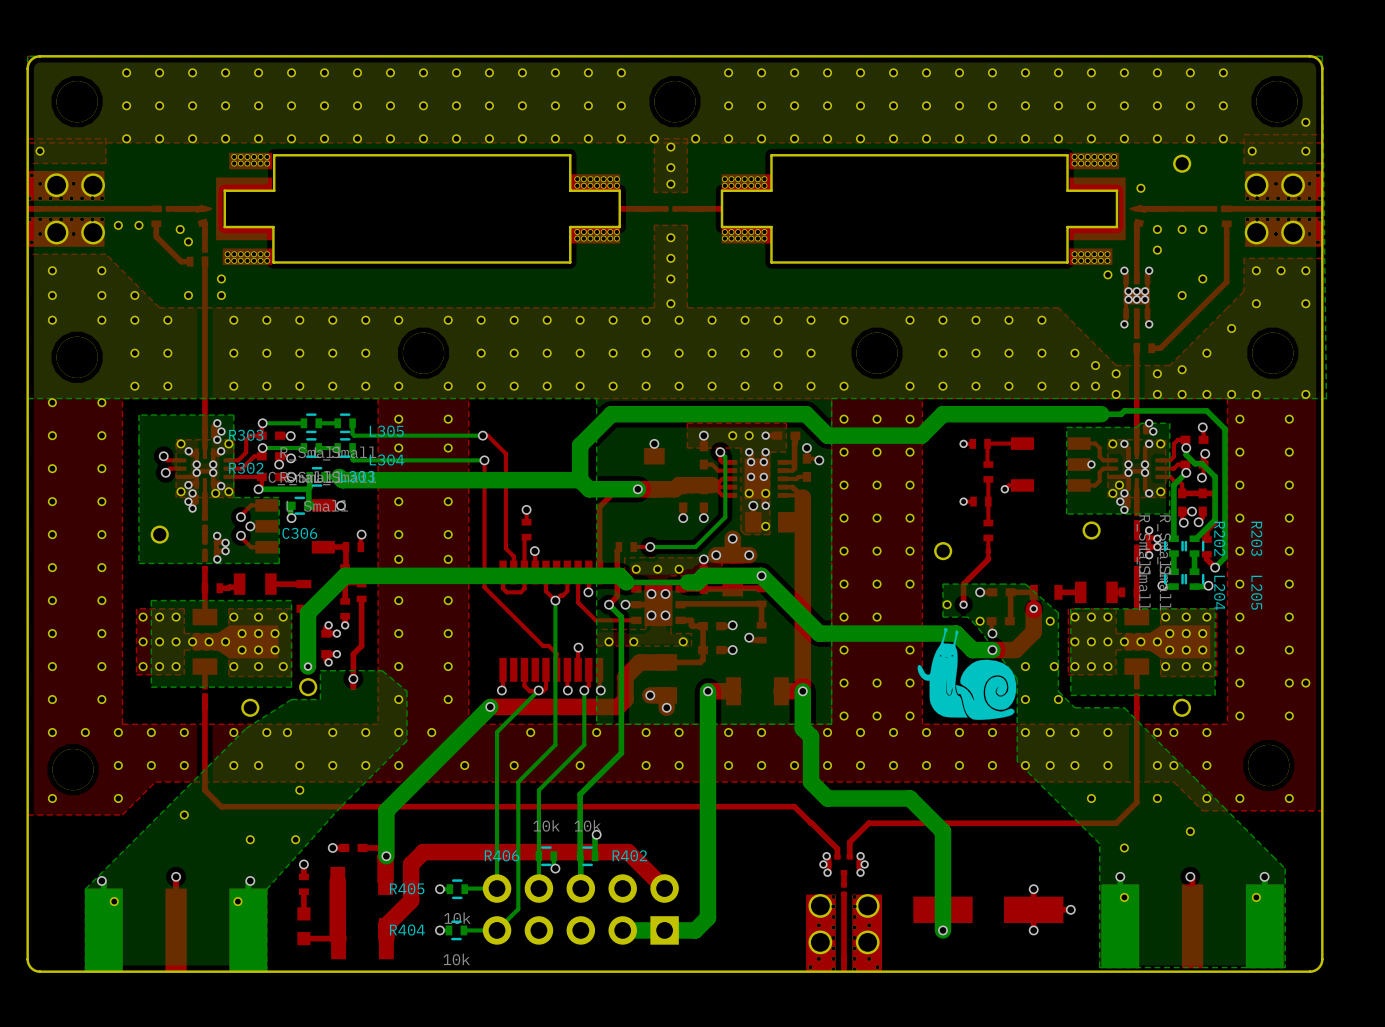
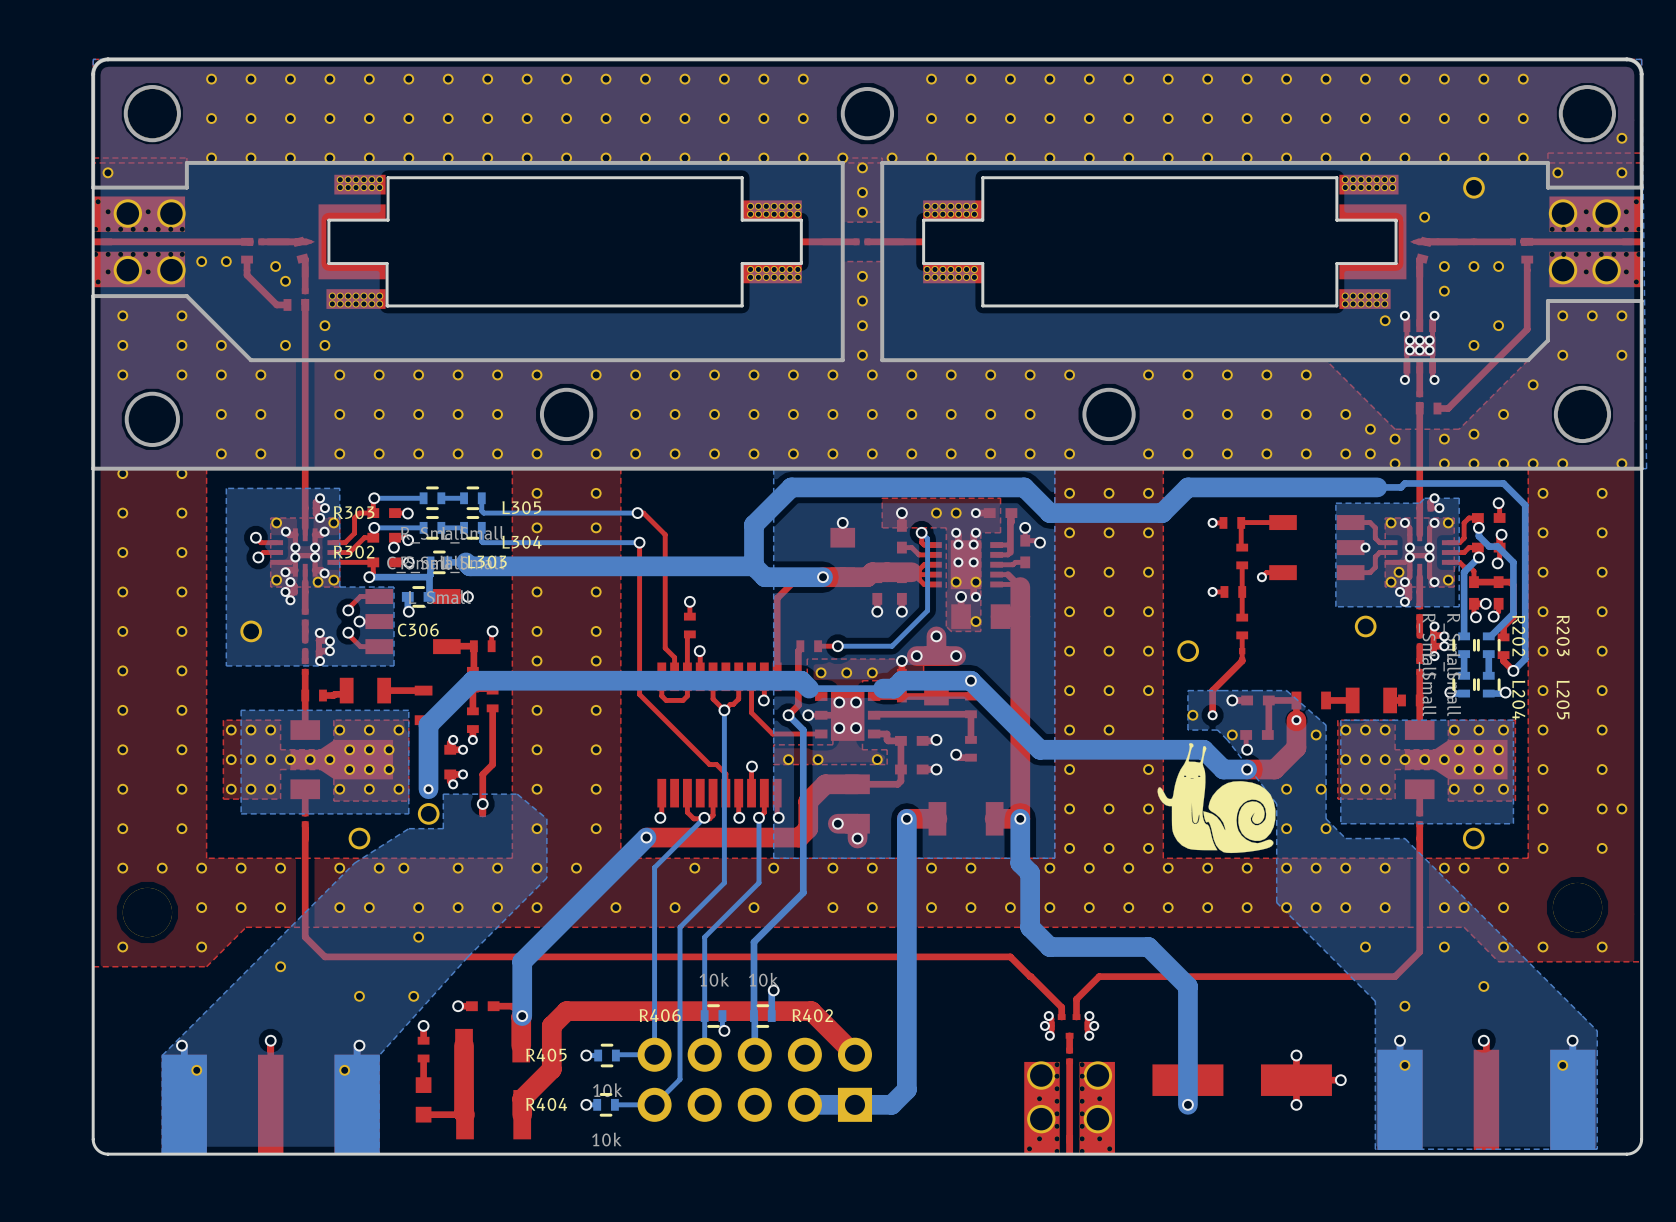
line: none -> (1626, 59) (104, 59) (97, 63) (93, 72) (93, 187) (186, 187) (186, 162) (842, 162) (842, 360) (250, 360) (186, 296) (93, 296) (93, 468) (1641, 468) (1641, 301) (1547, 301) (1547, 340) (1528, 360) (882, 360) (882, 162) (1547, 162) (1547, 187) (1641, 187) (1641, 72) (1637, 63) (1626, 59)
drawing: none -> [123, 85, 181, 143]
drawing: none -> [1558, 85, 1616, 143]
drawing: none -> [840, 86, 895, 141]
drawing: none -> [1553, 385, 1612, 444]
drawing: none -> [539, 387, 594, 442]
drawing: none -> [1082, 387, 1136, 442]
drawing: none -> [124, 391, 180, 447]

